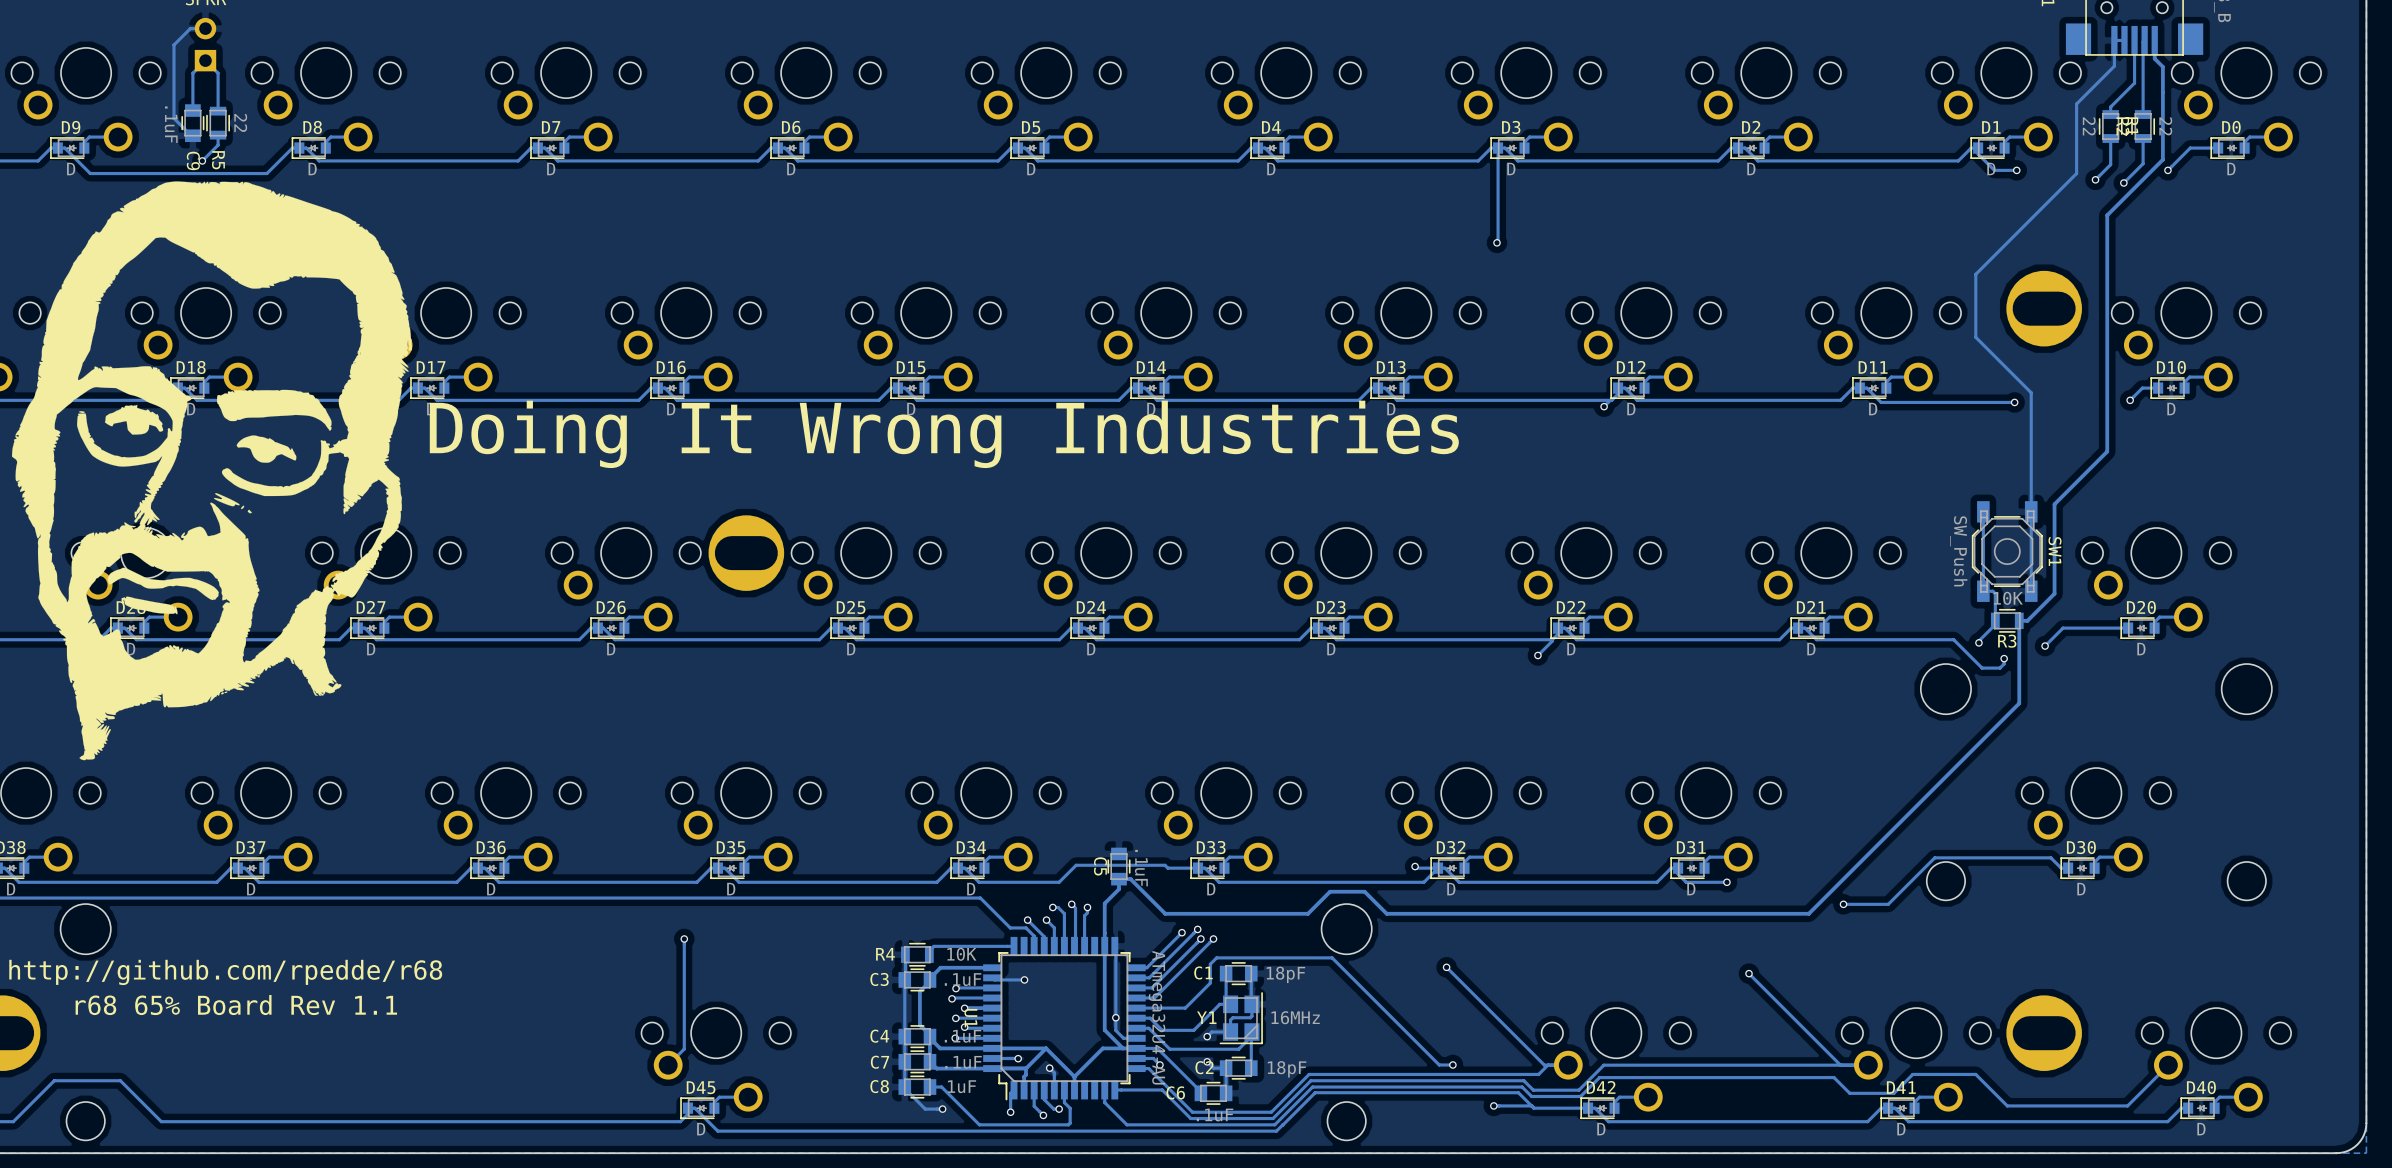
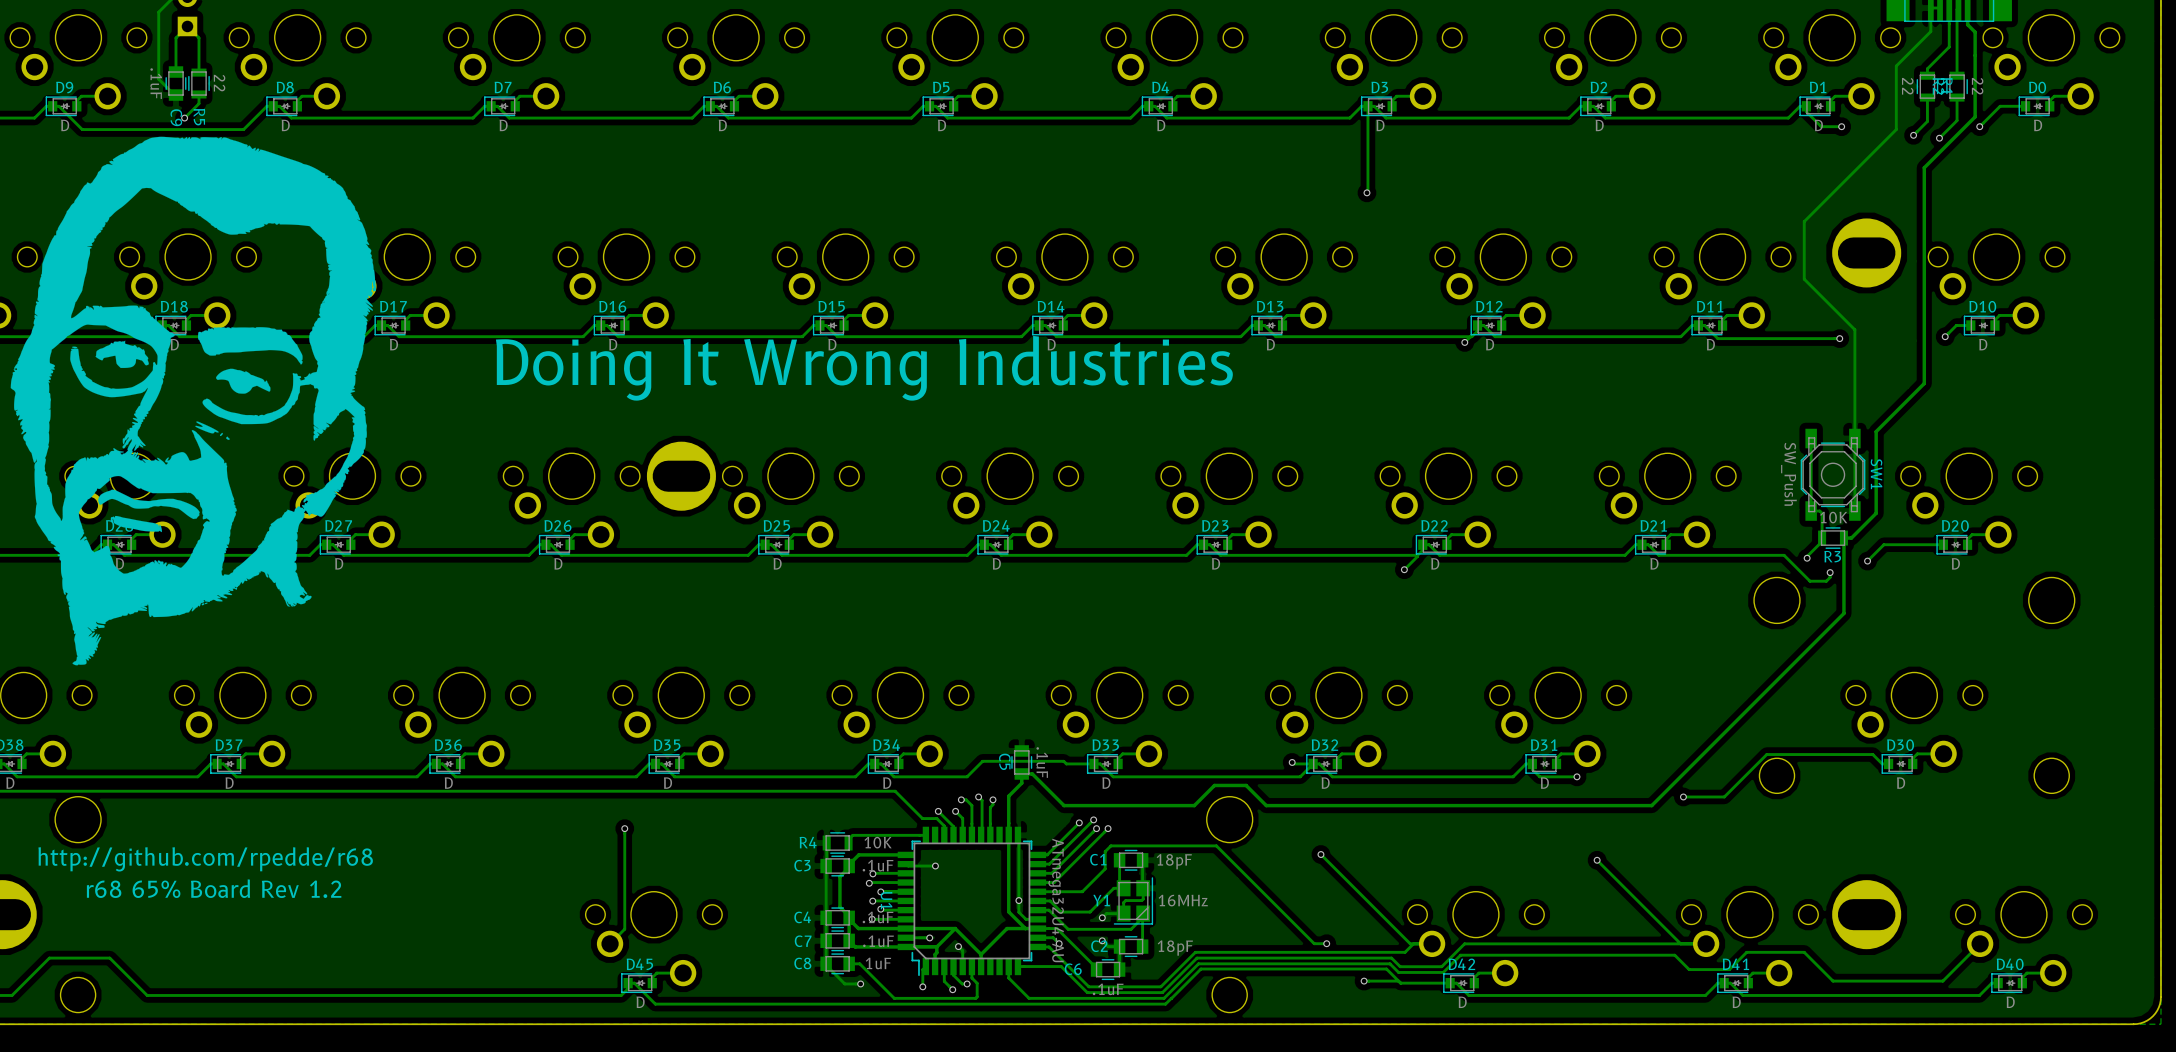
text: r68 65% Board Rev 1.1 (236, 1005) -> r68 65% Board Rev 1.2 (214, 888)

